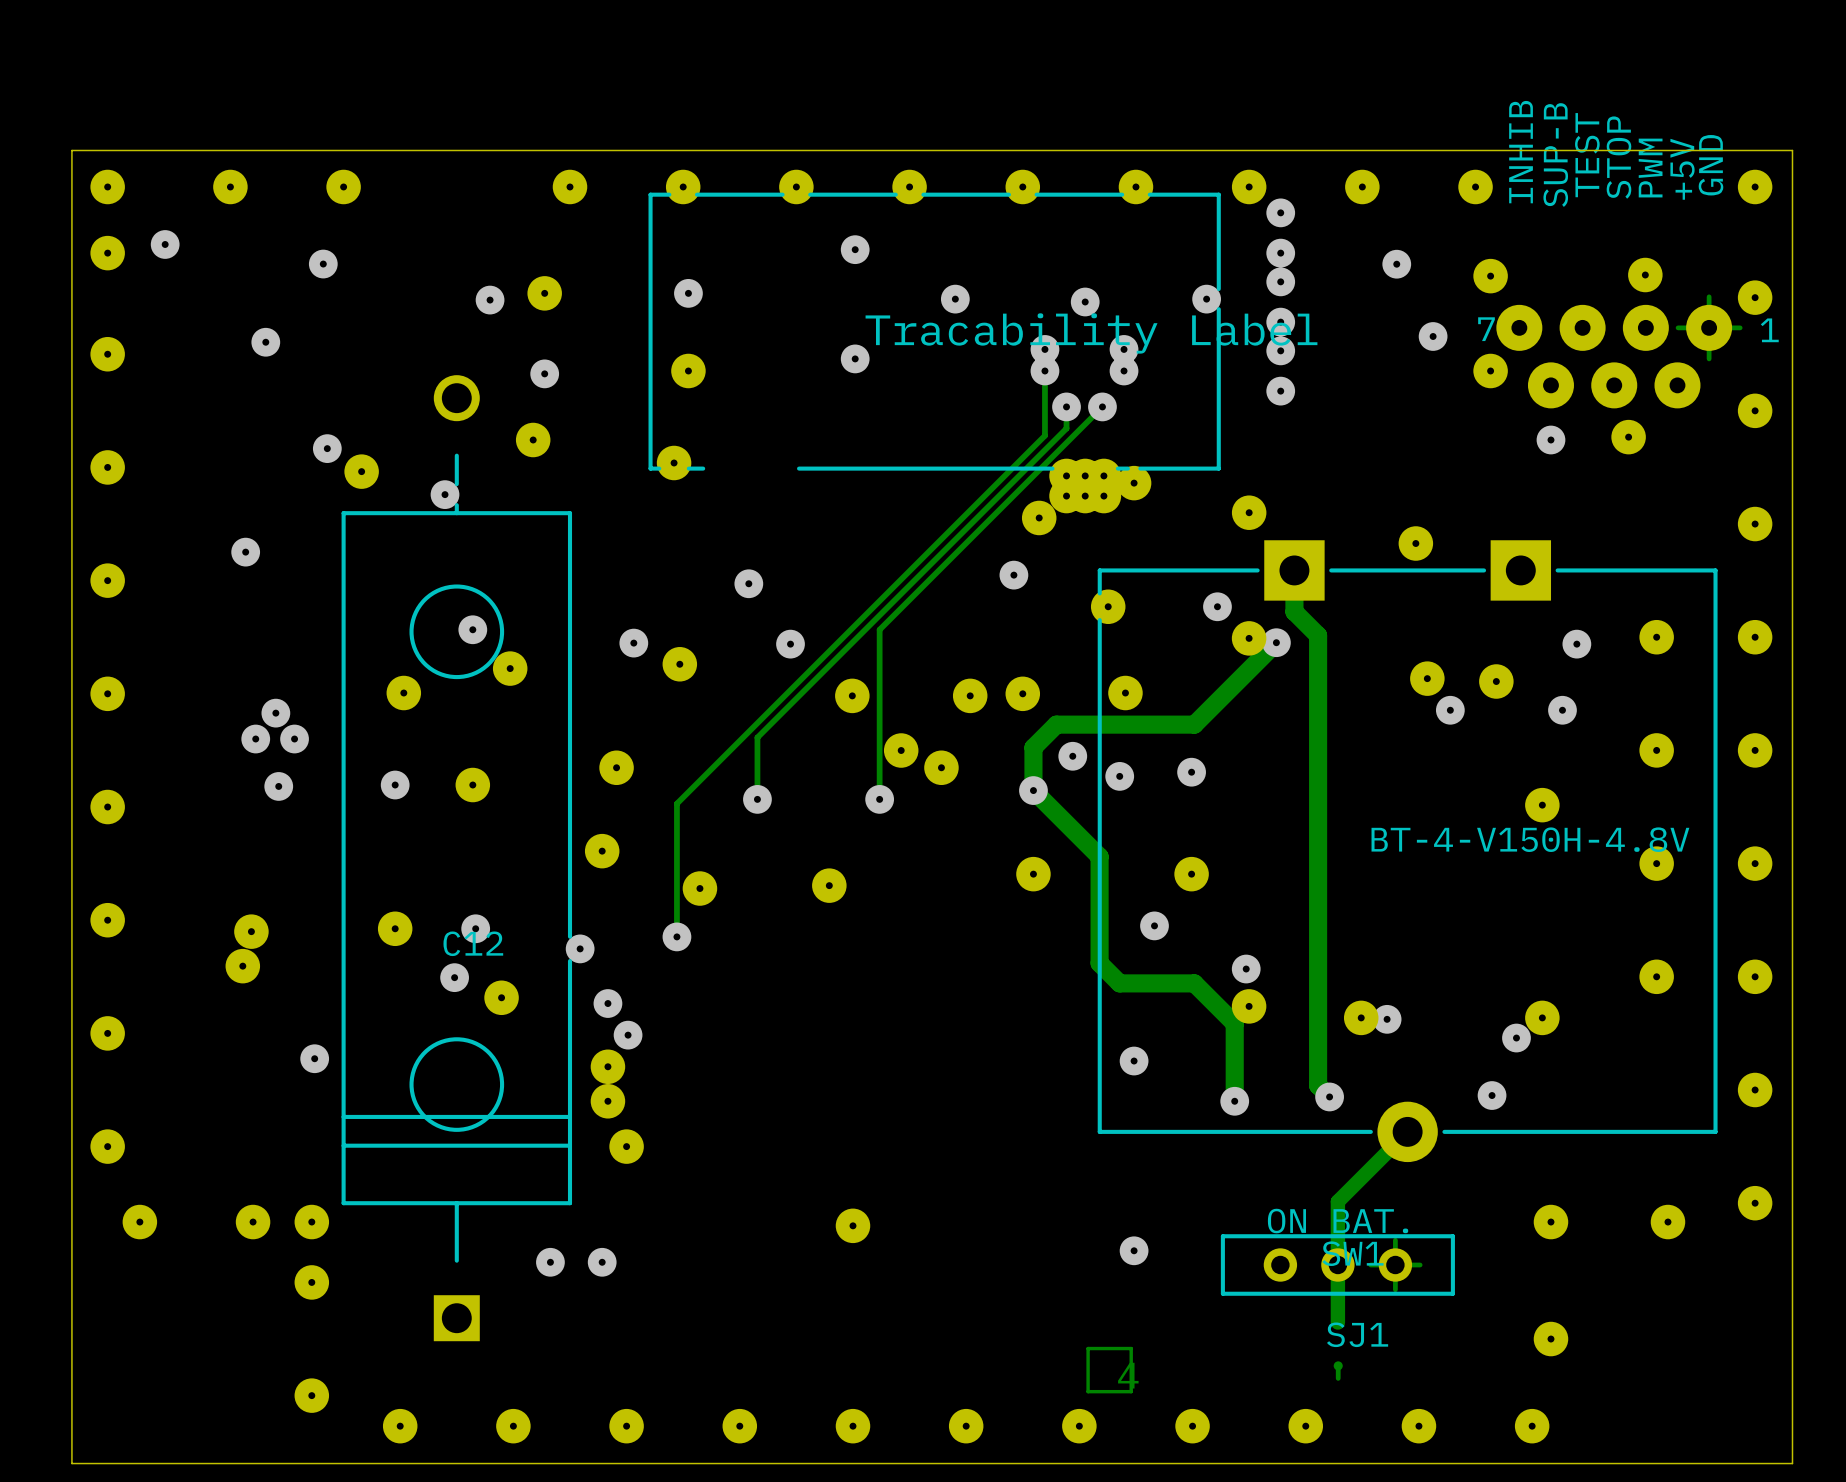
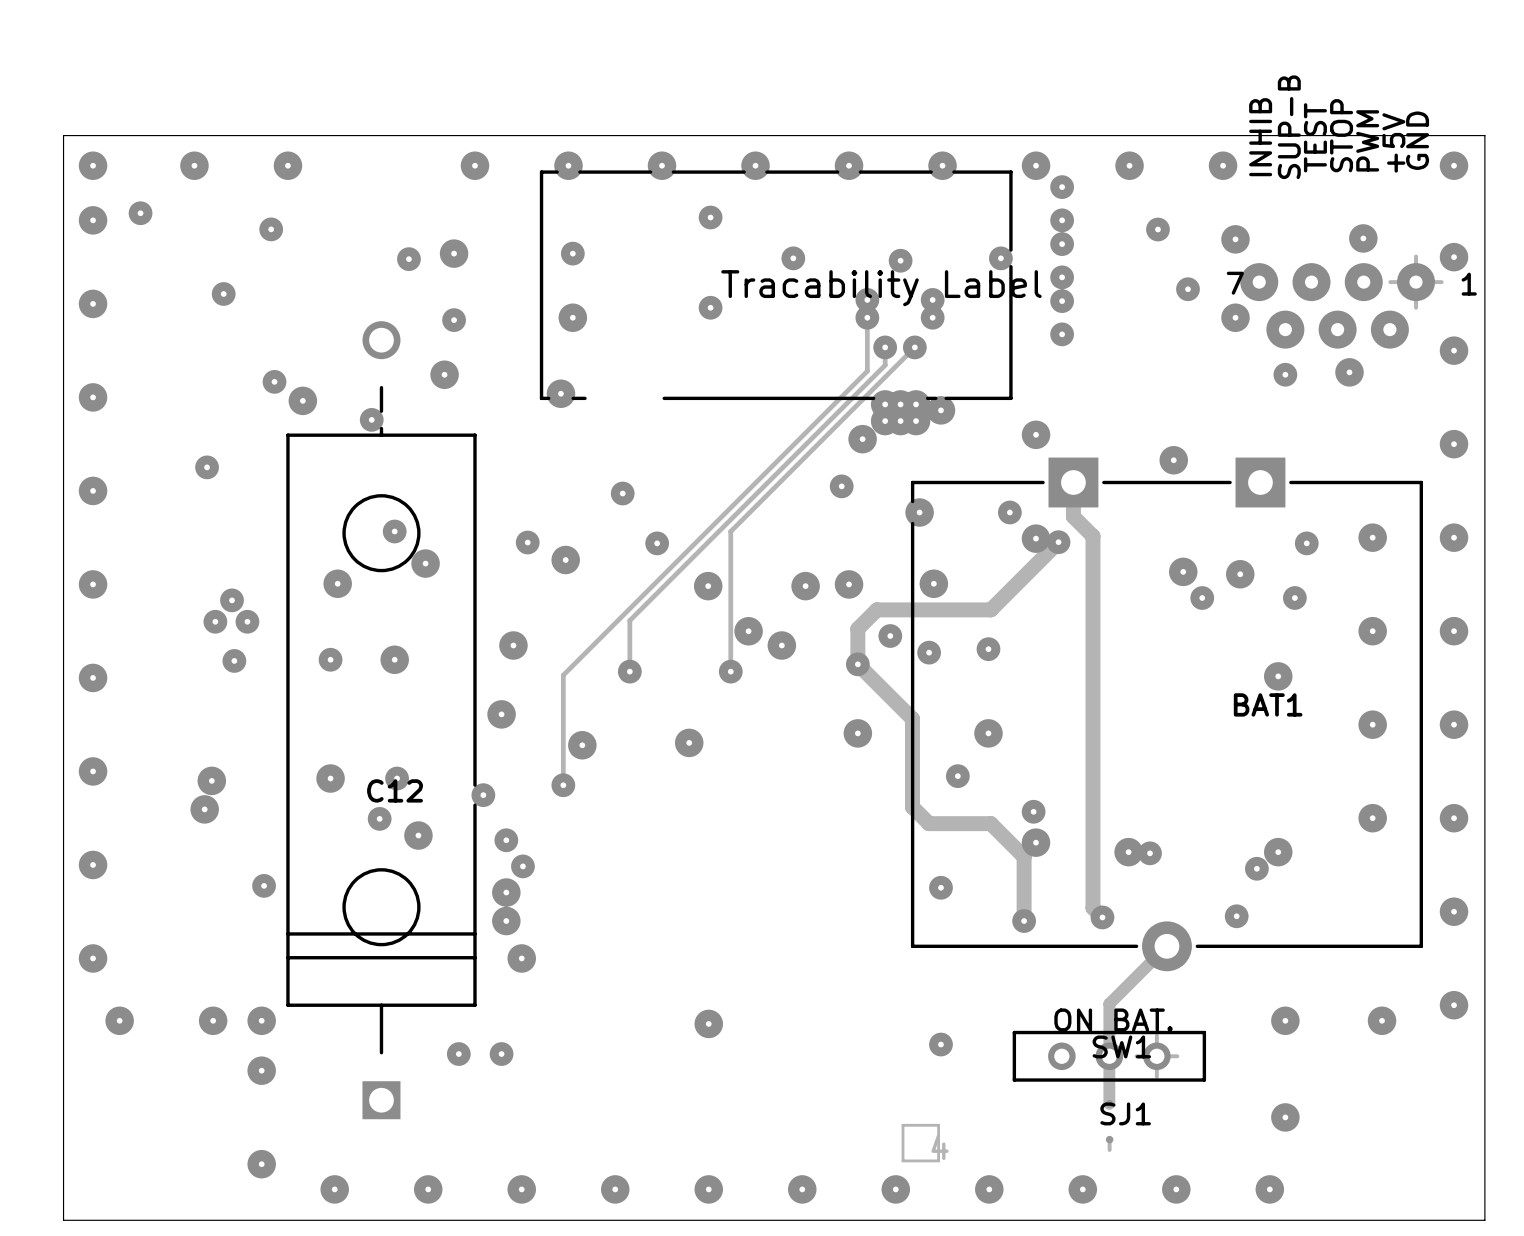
BT-4-V150H-4.8V name: BT-4-V150H-4.8V (1530, 839) -> BAT1 (1268, 704)

